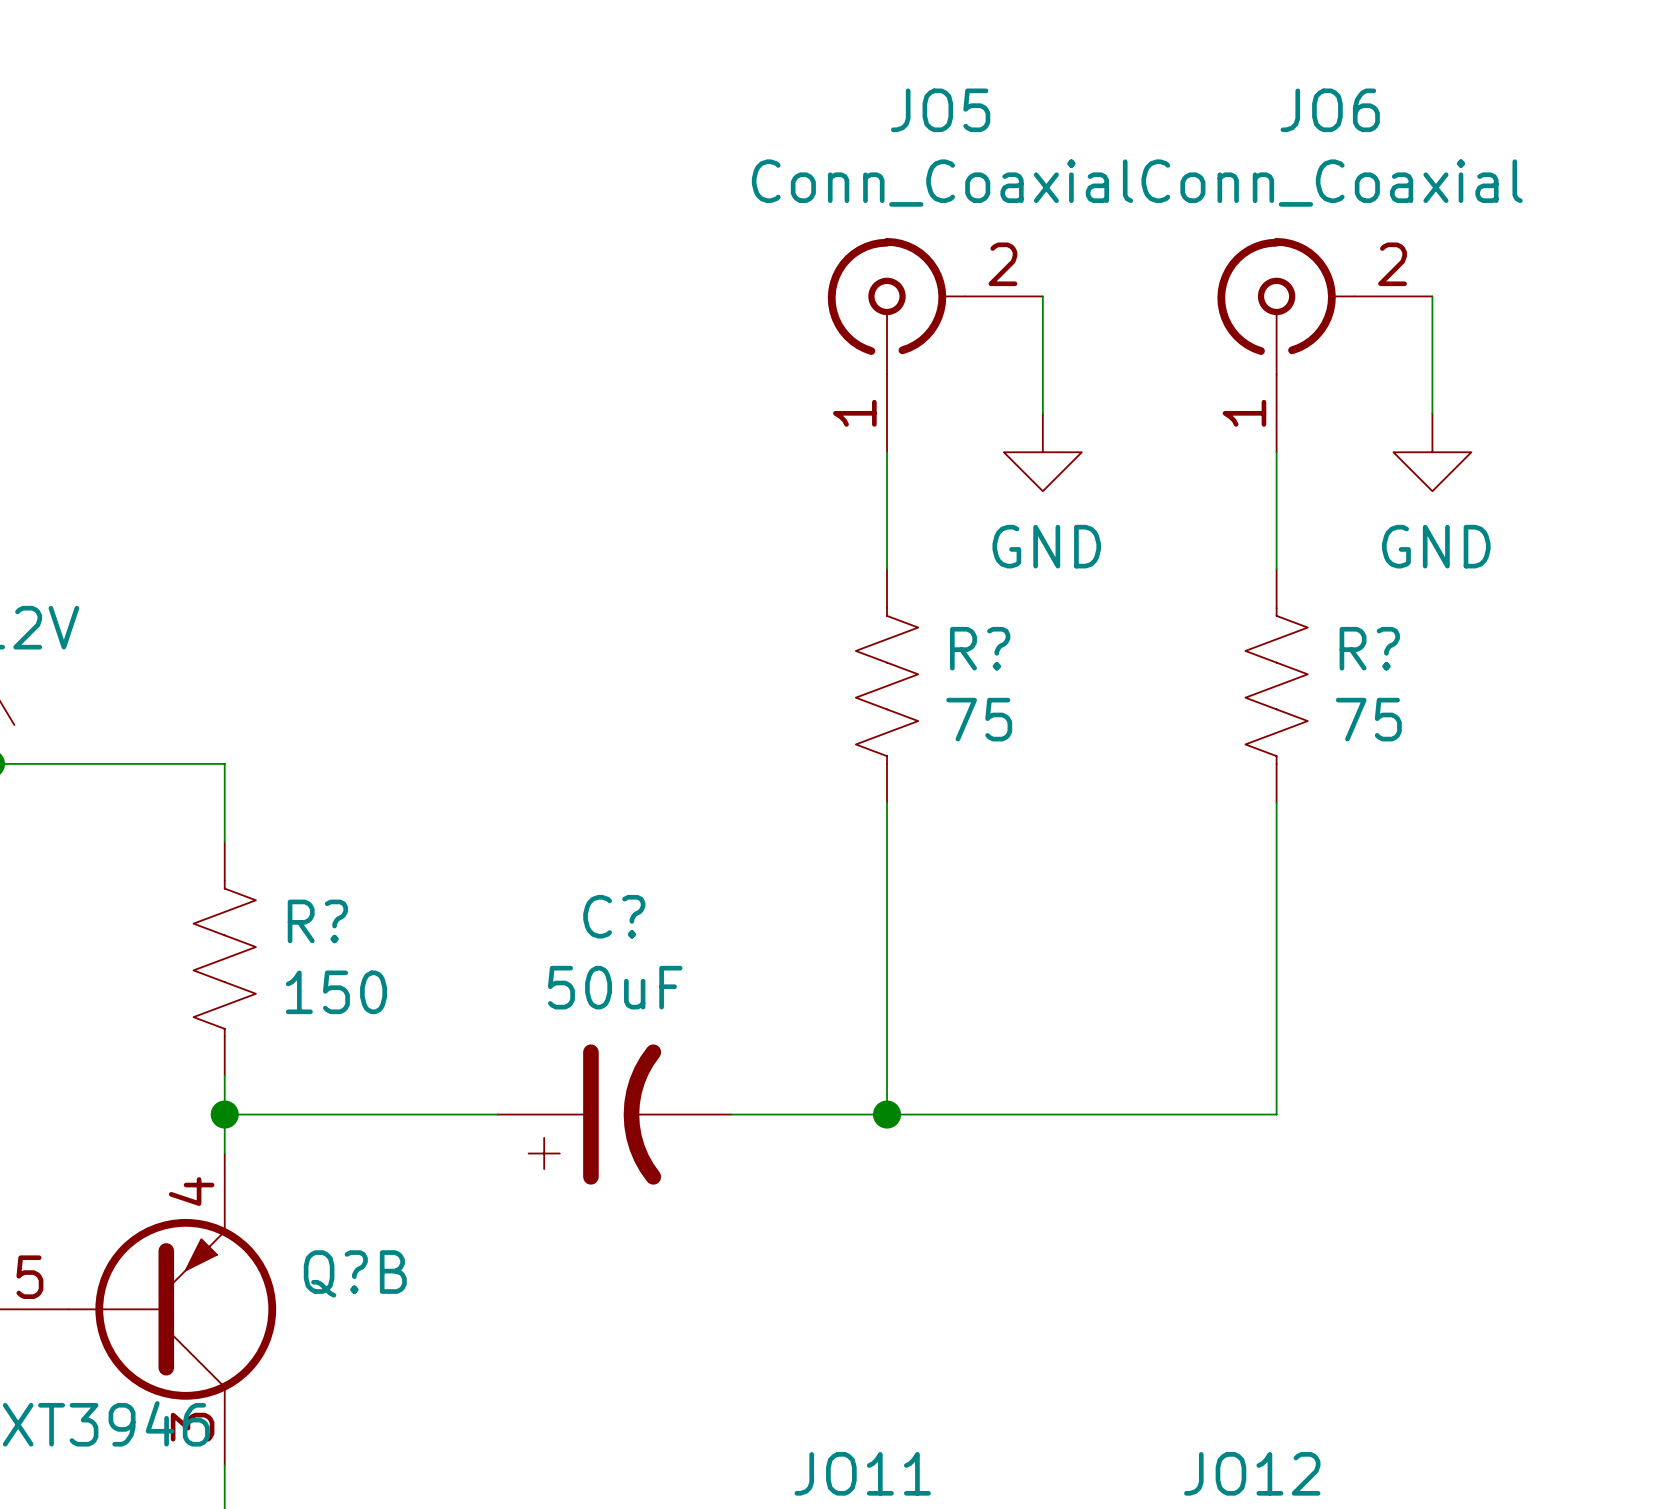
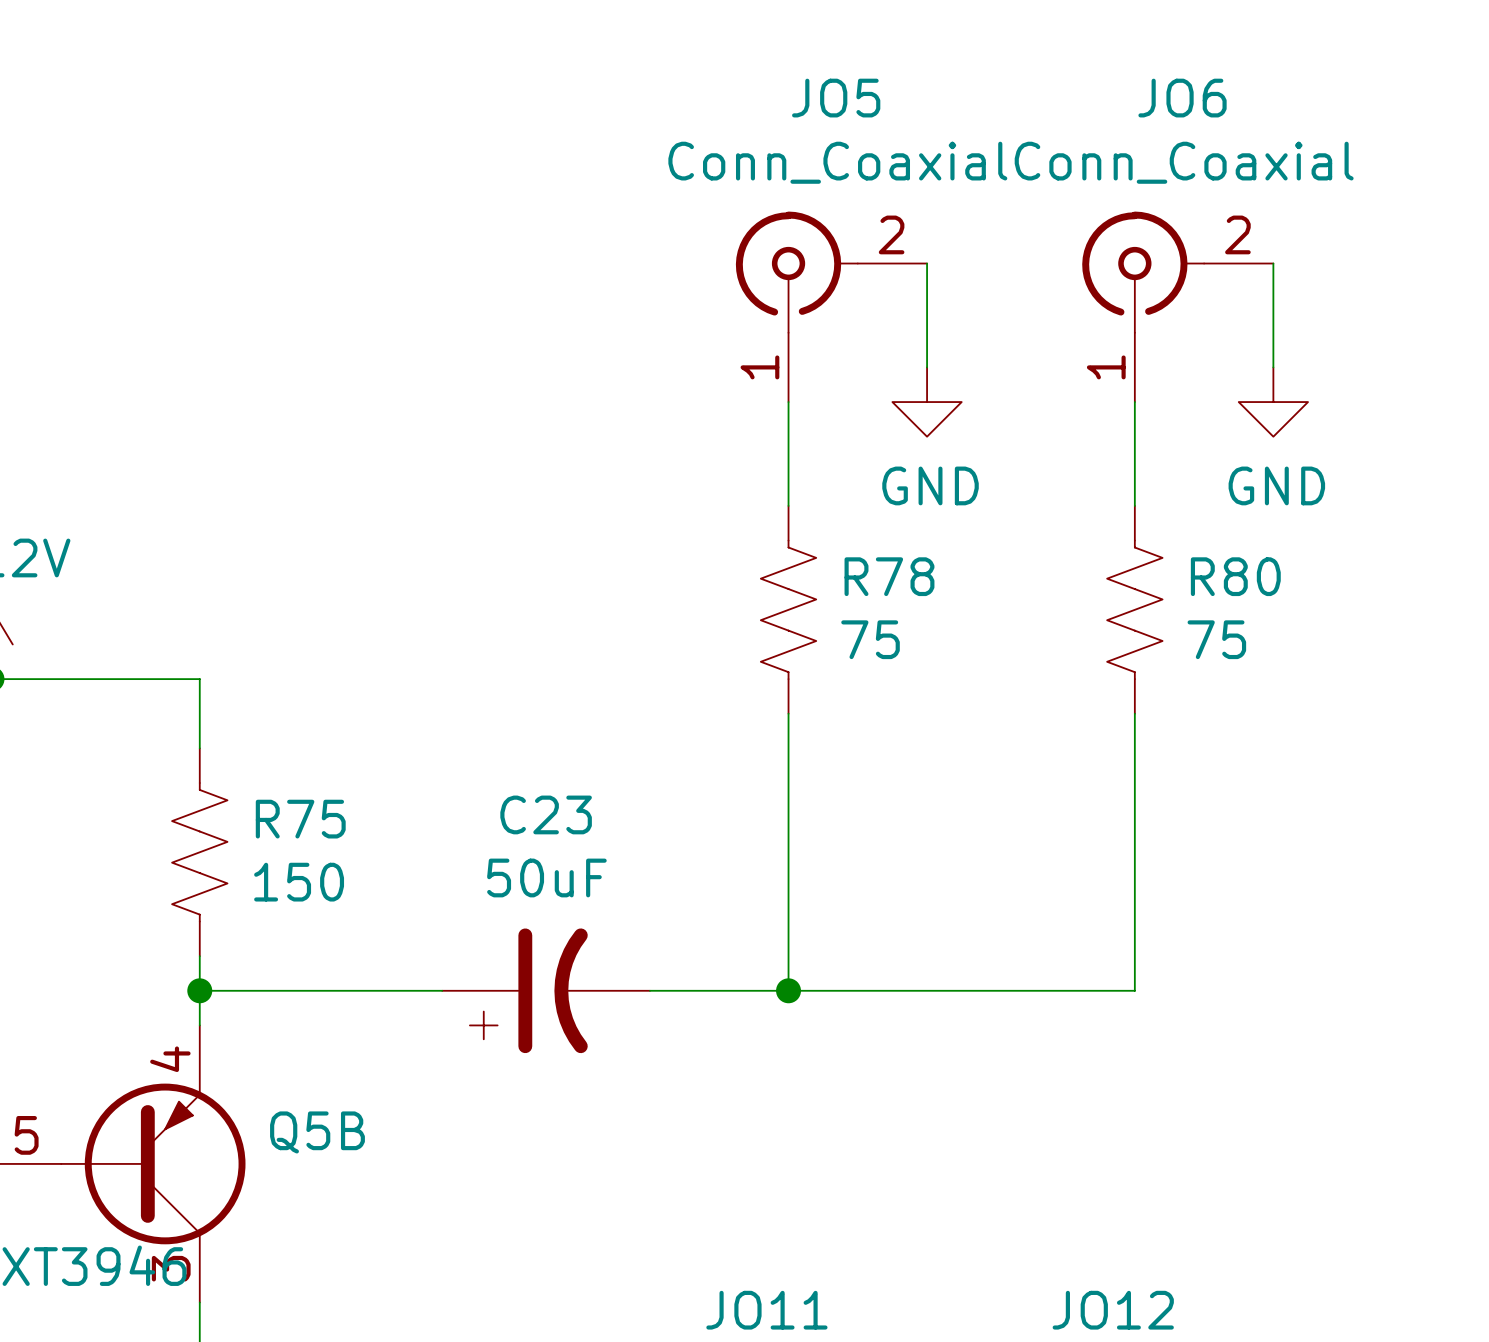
R? name: R? (980, 648) -> R78 (889, 576)
R? name: R? (1369, 648) -> R80 (1235, 576)
C? name: C? (614, 916) -> C23 (546, 814)
R? name: R? (317, 921) -> R75 (300, 819)
Q?B name: Q?B (355, 1273) -> Q5B (317, 1132)

